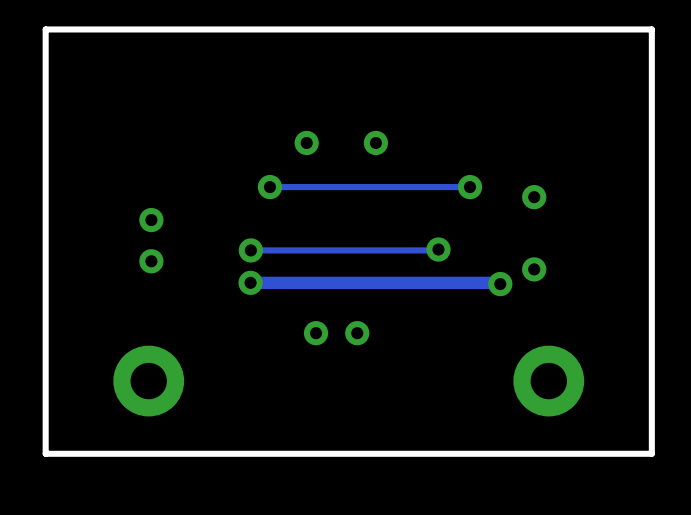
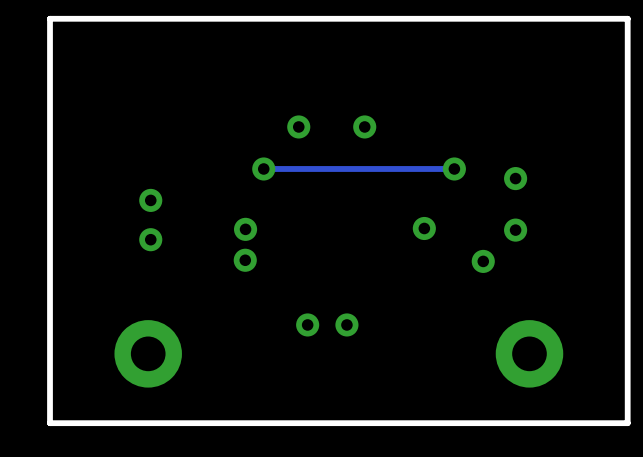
track: (438, 249) (250, 250) -> none
part position: (534, 269) -> (515, 230)
track: (250, 282) (500, 284) -> none
part position: (336, 333) -> (327, 324)

